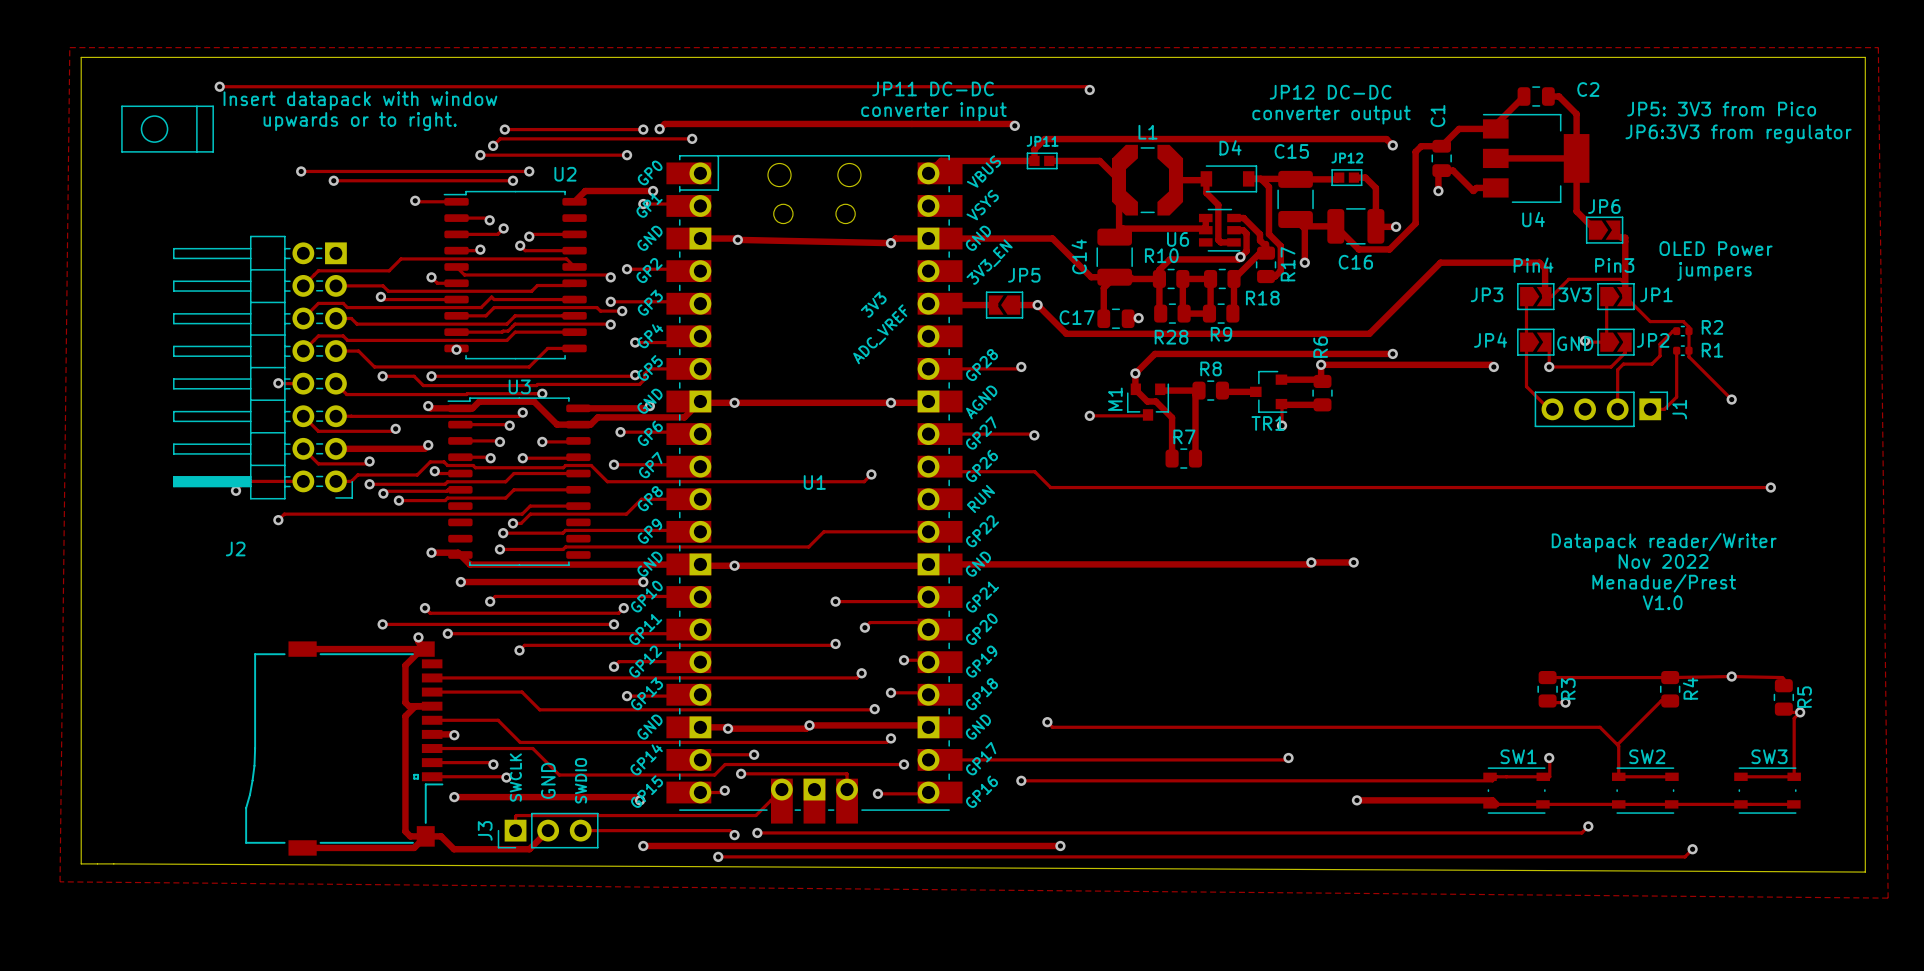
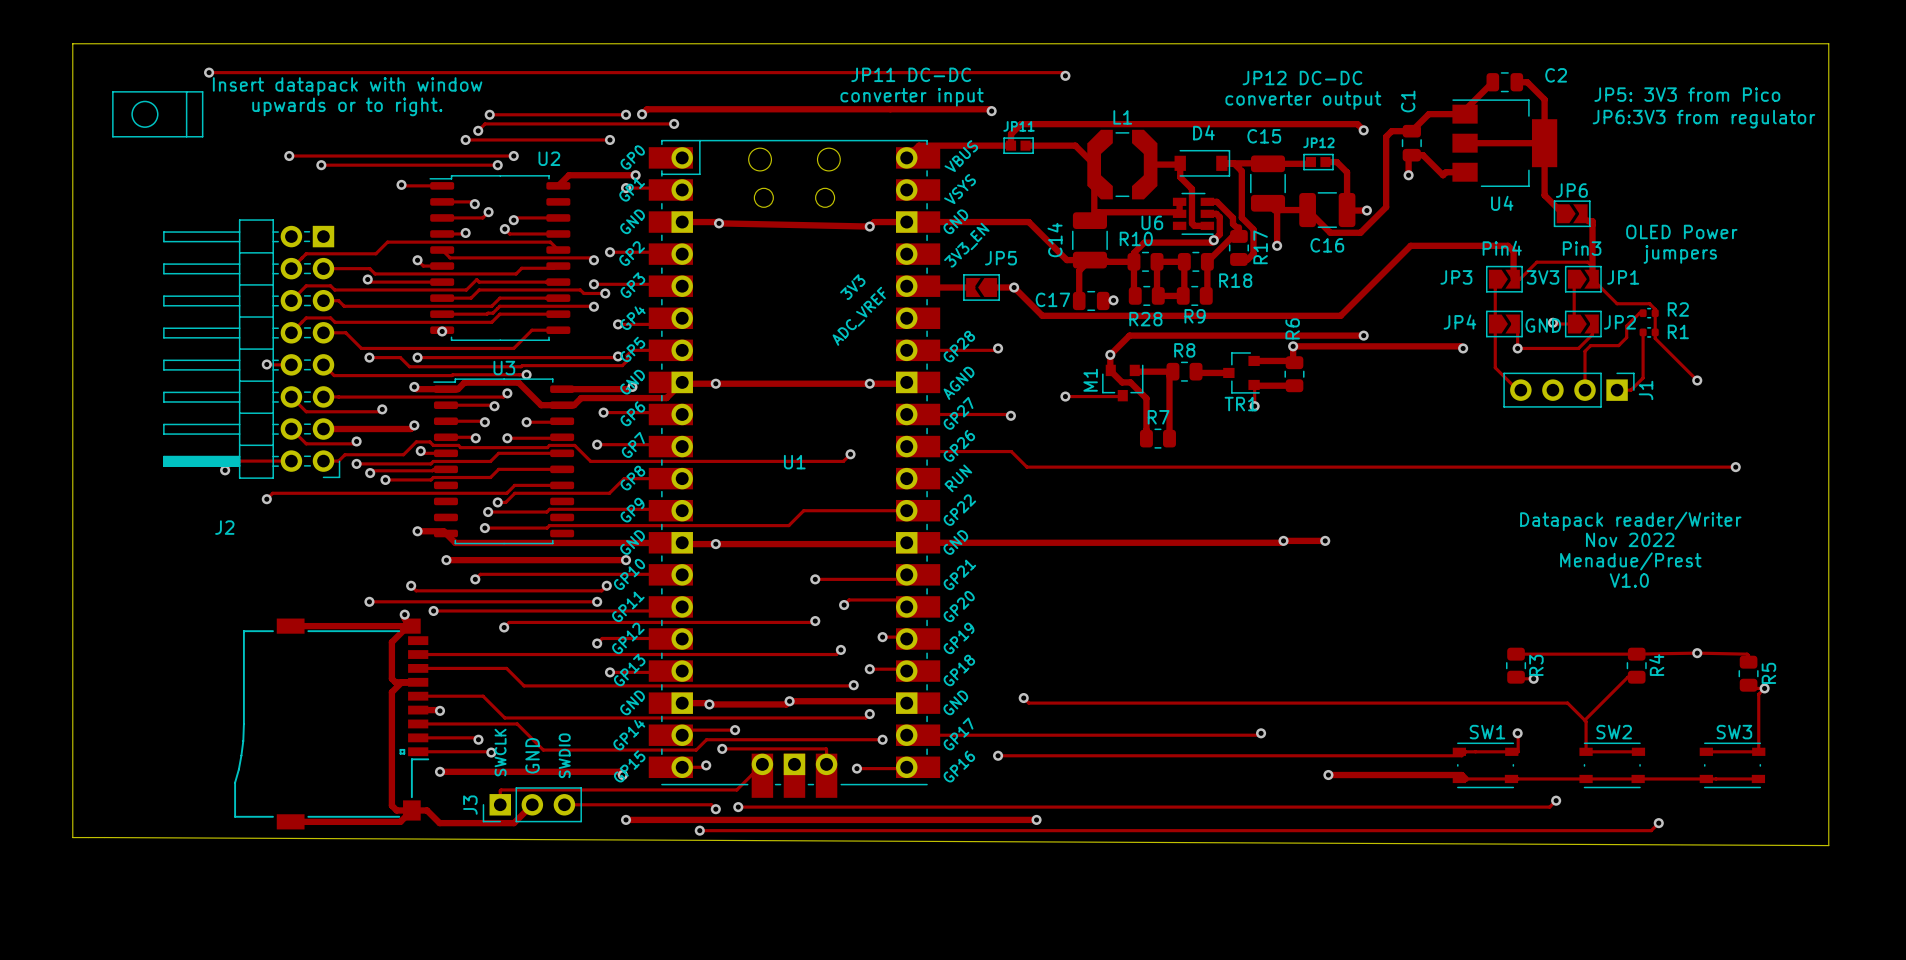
zone outline: (69, 47) (60, 881) (1888, 898) (1878, 47) (69, 47) -> none

